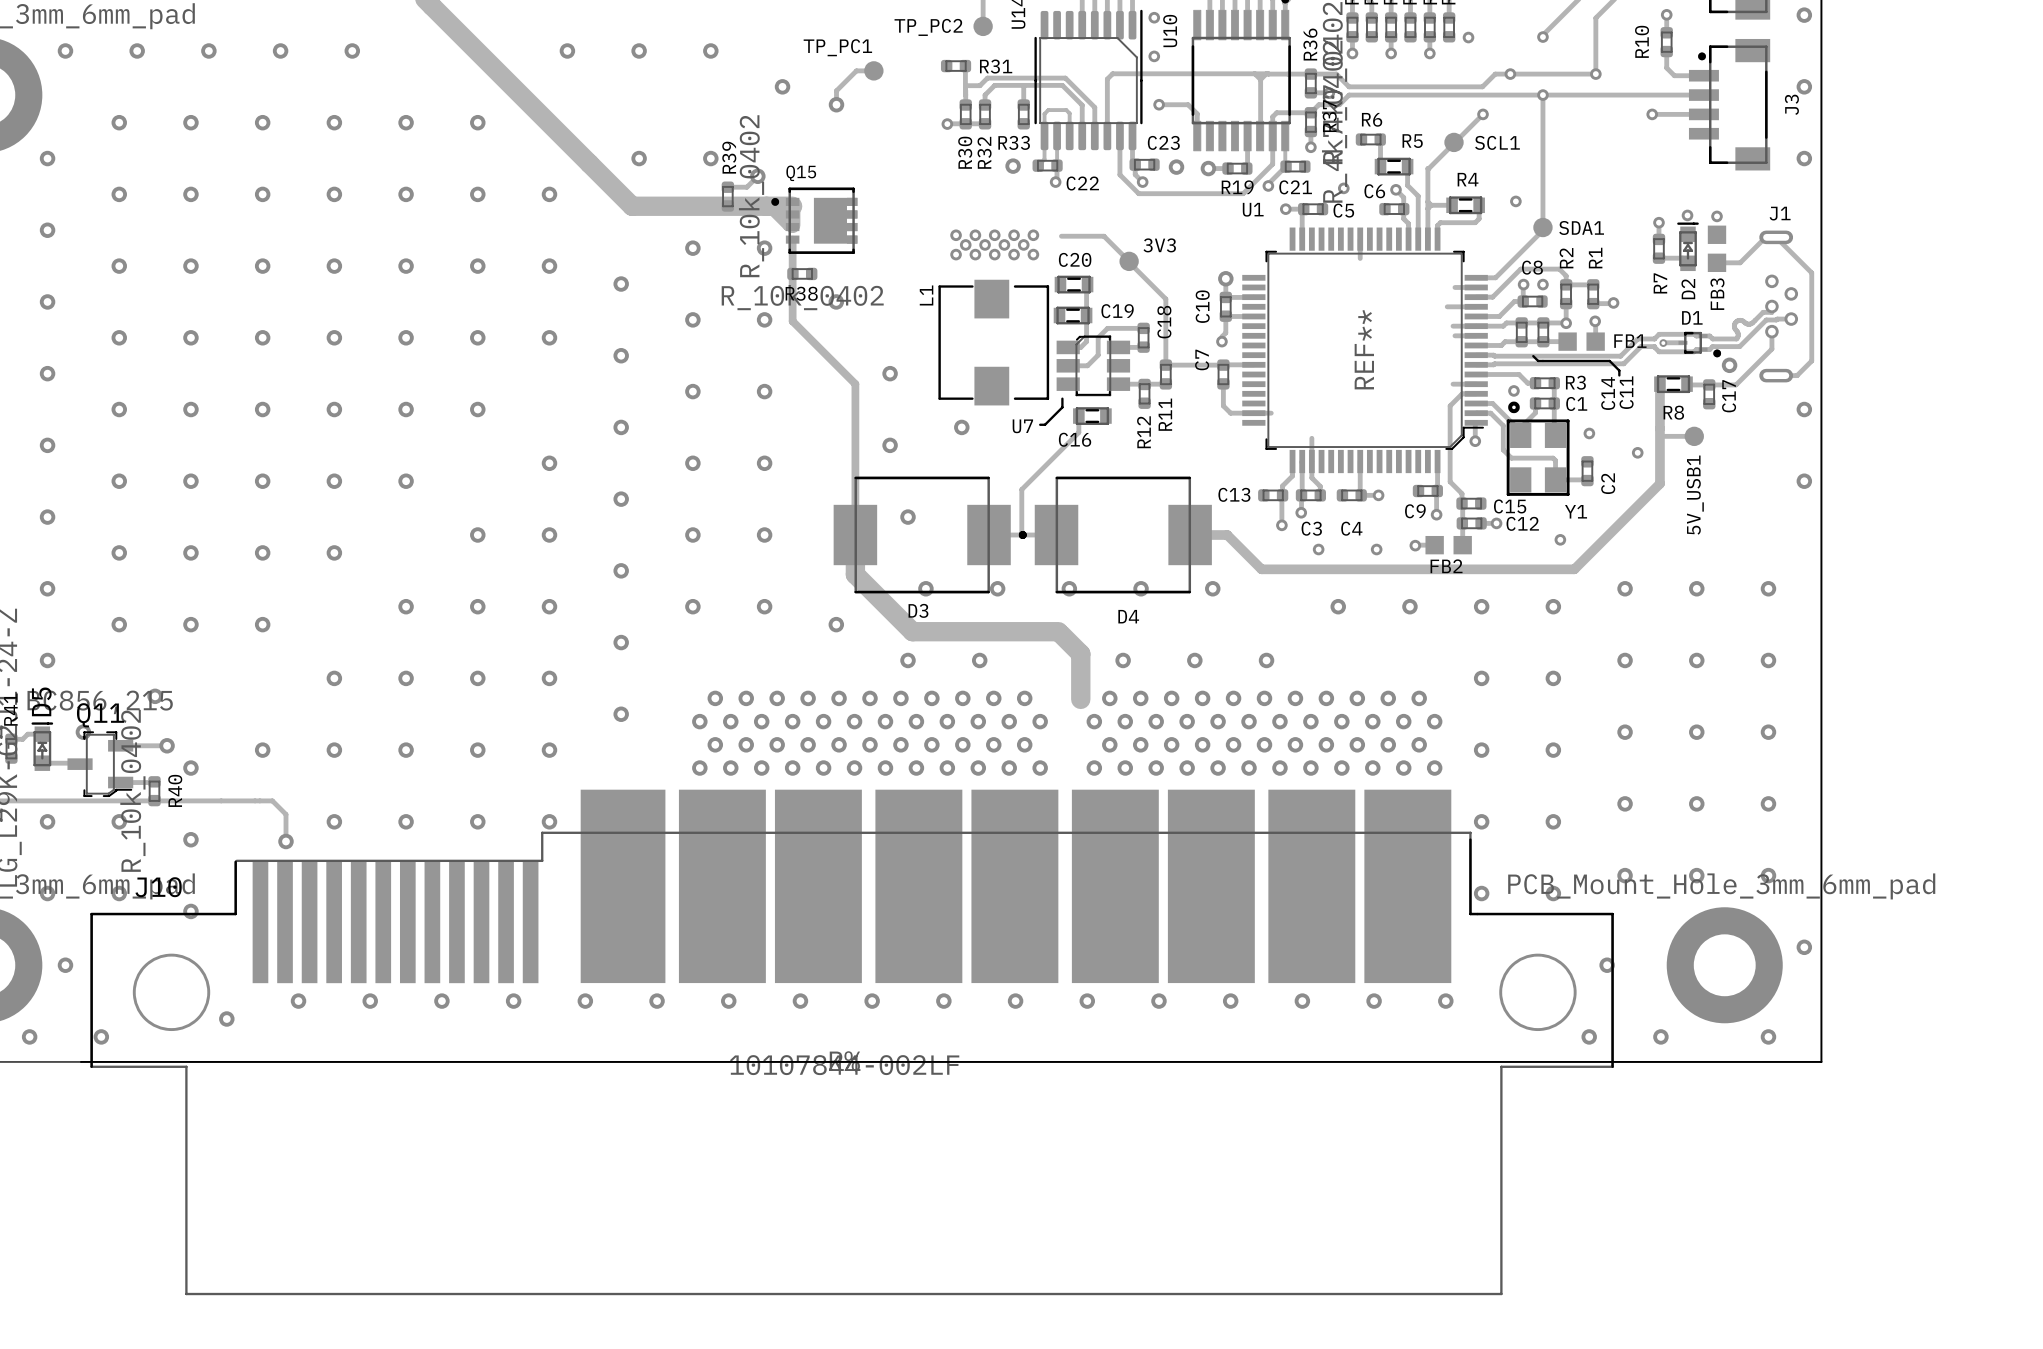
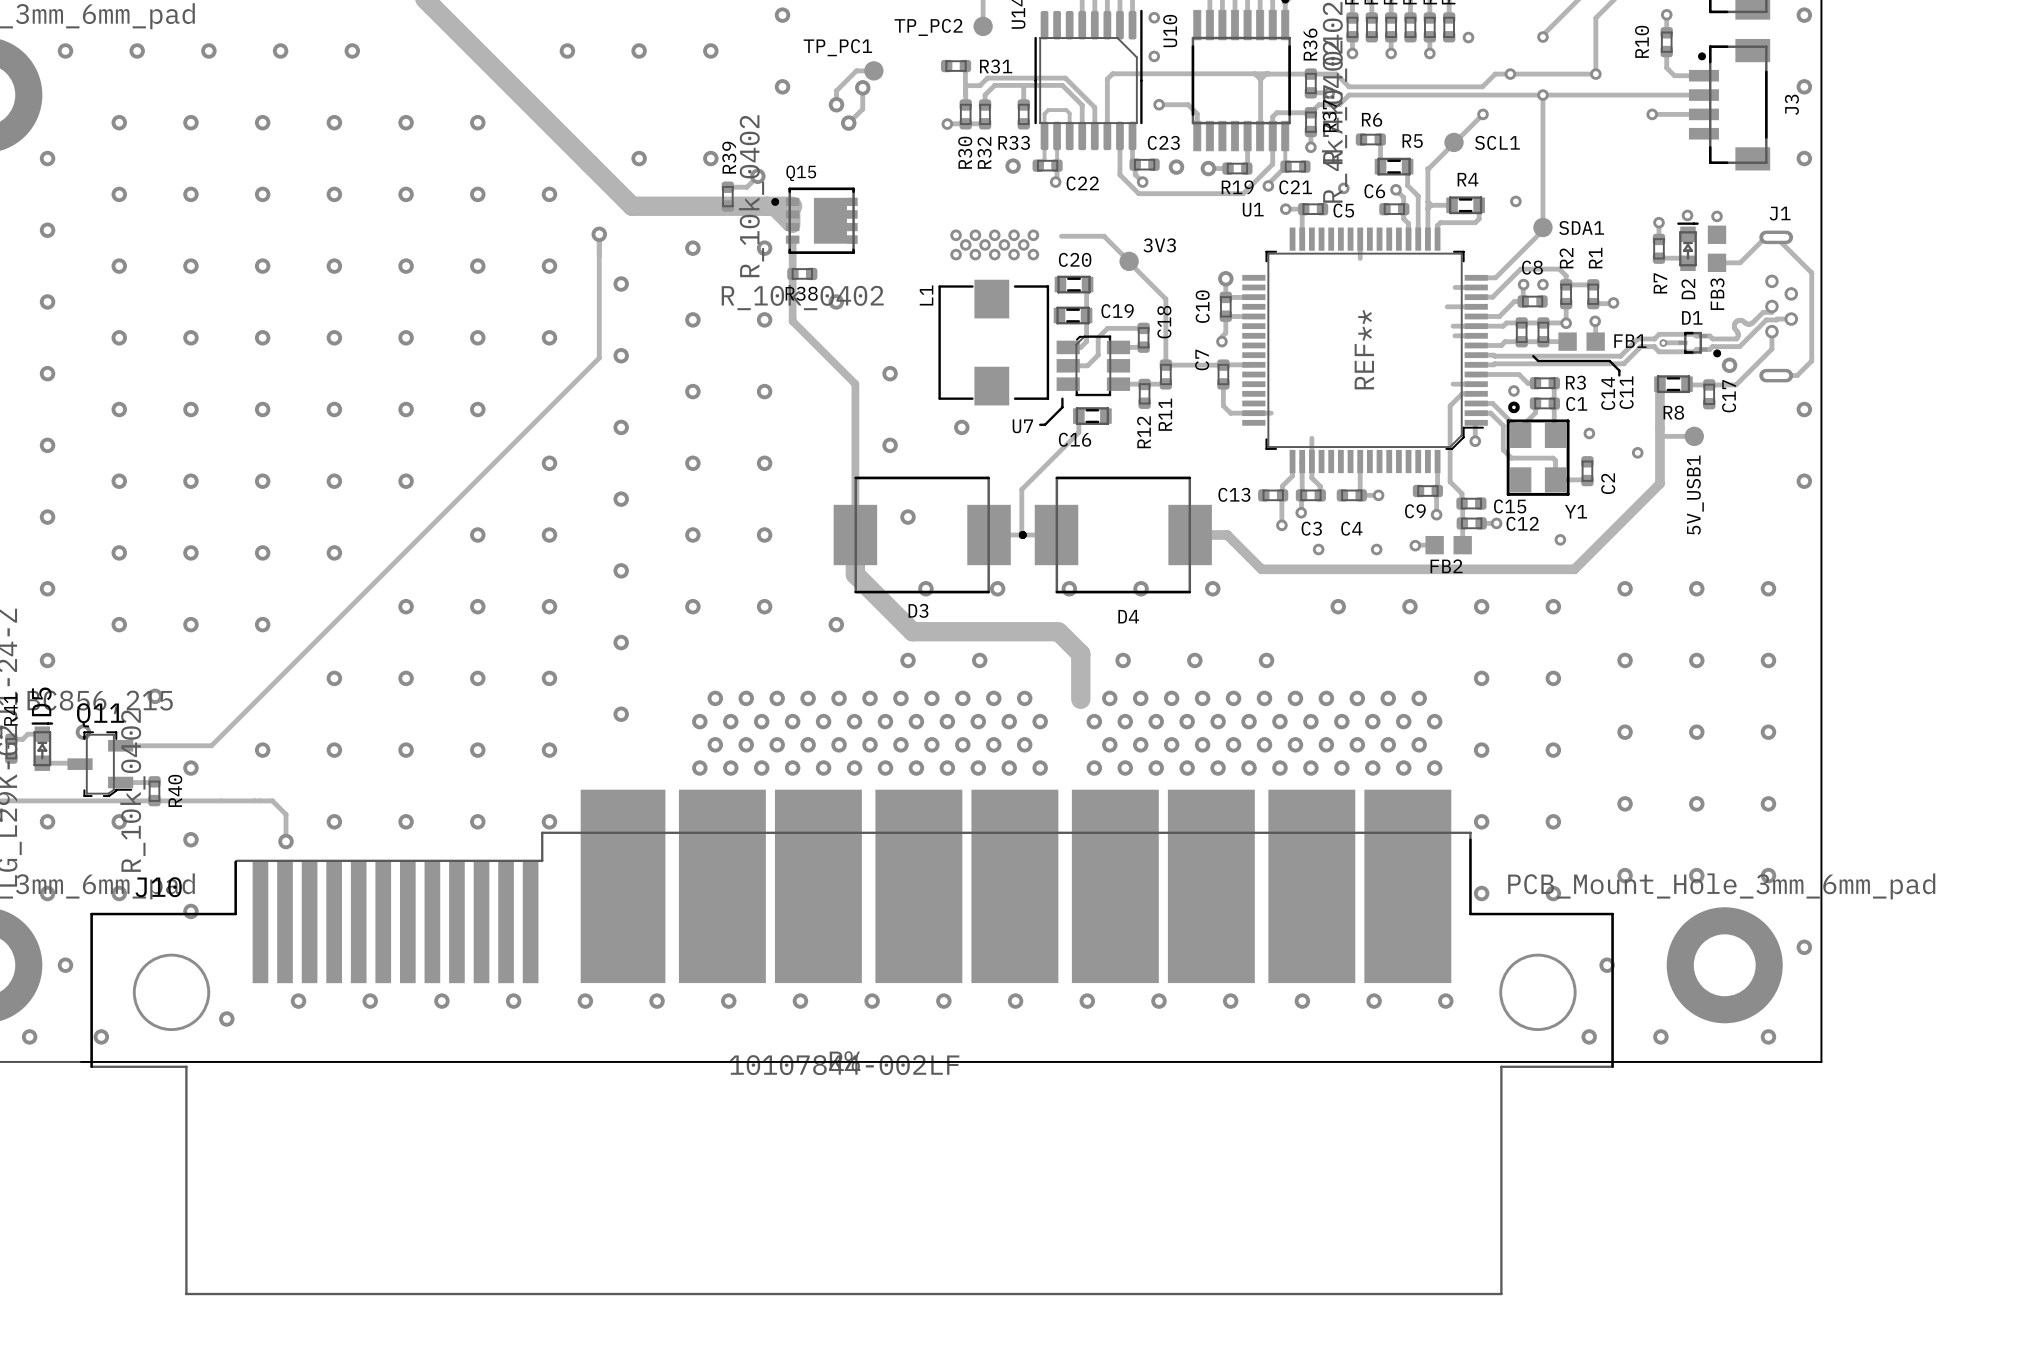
via: none -> (782, 15)
track: none -> (862, 87) (862, 109) (848, 123)
via: none -> (862, 87)
via: none -> (848, 123)
track: none -> (599, 234) (599, 358) (211, 745) (167, 745)
via: none -> (599, 234)
via: (167, 745) -> none

